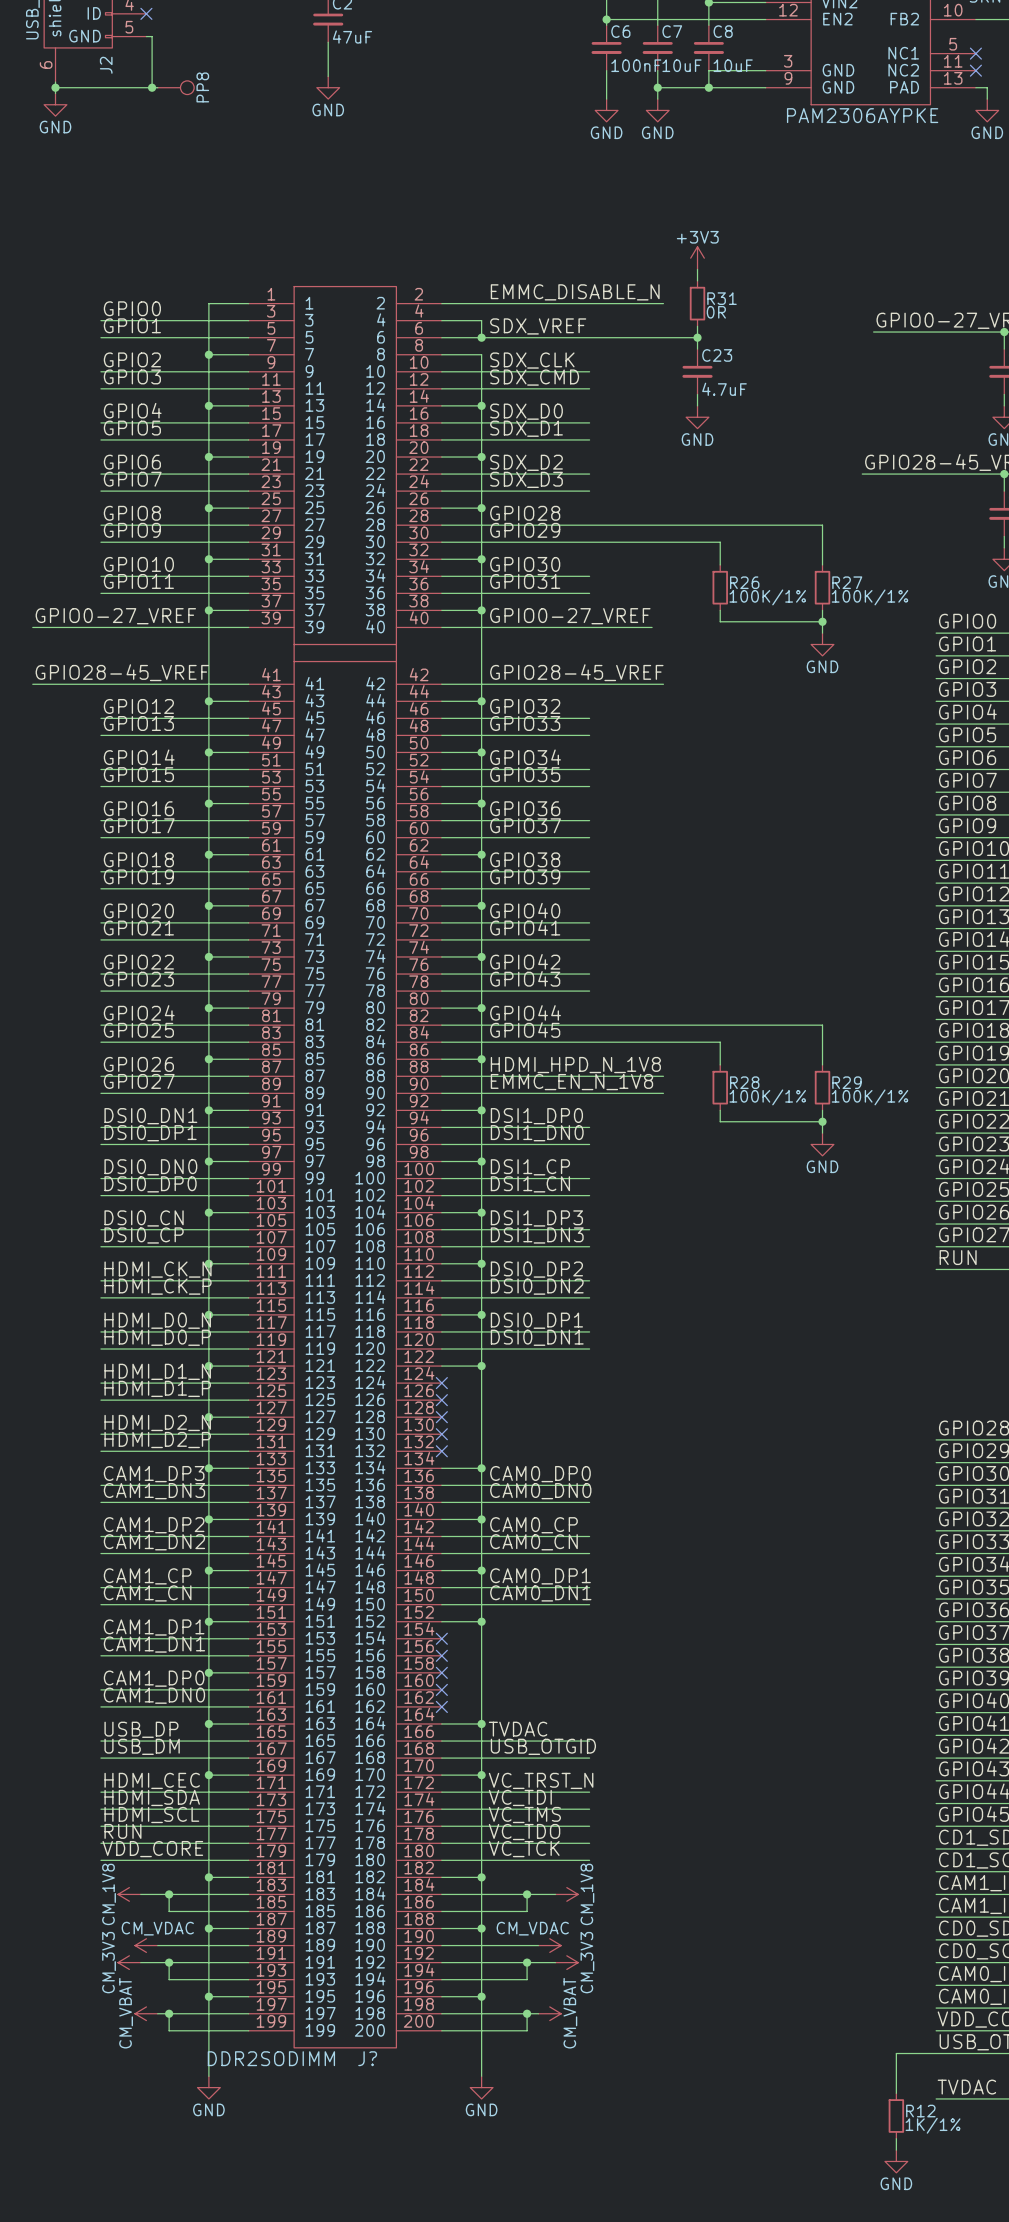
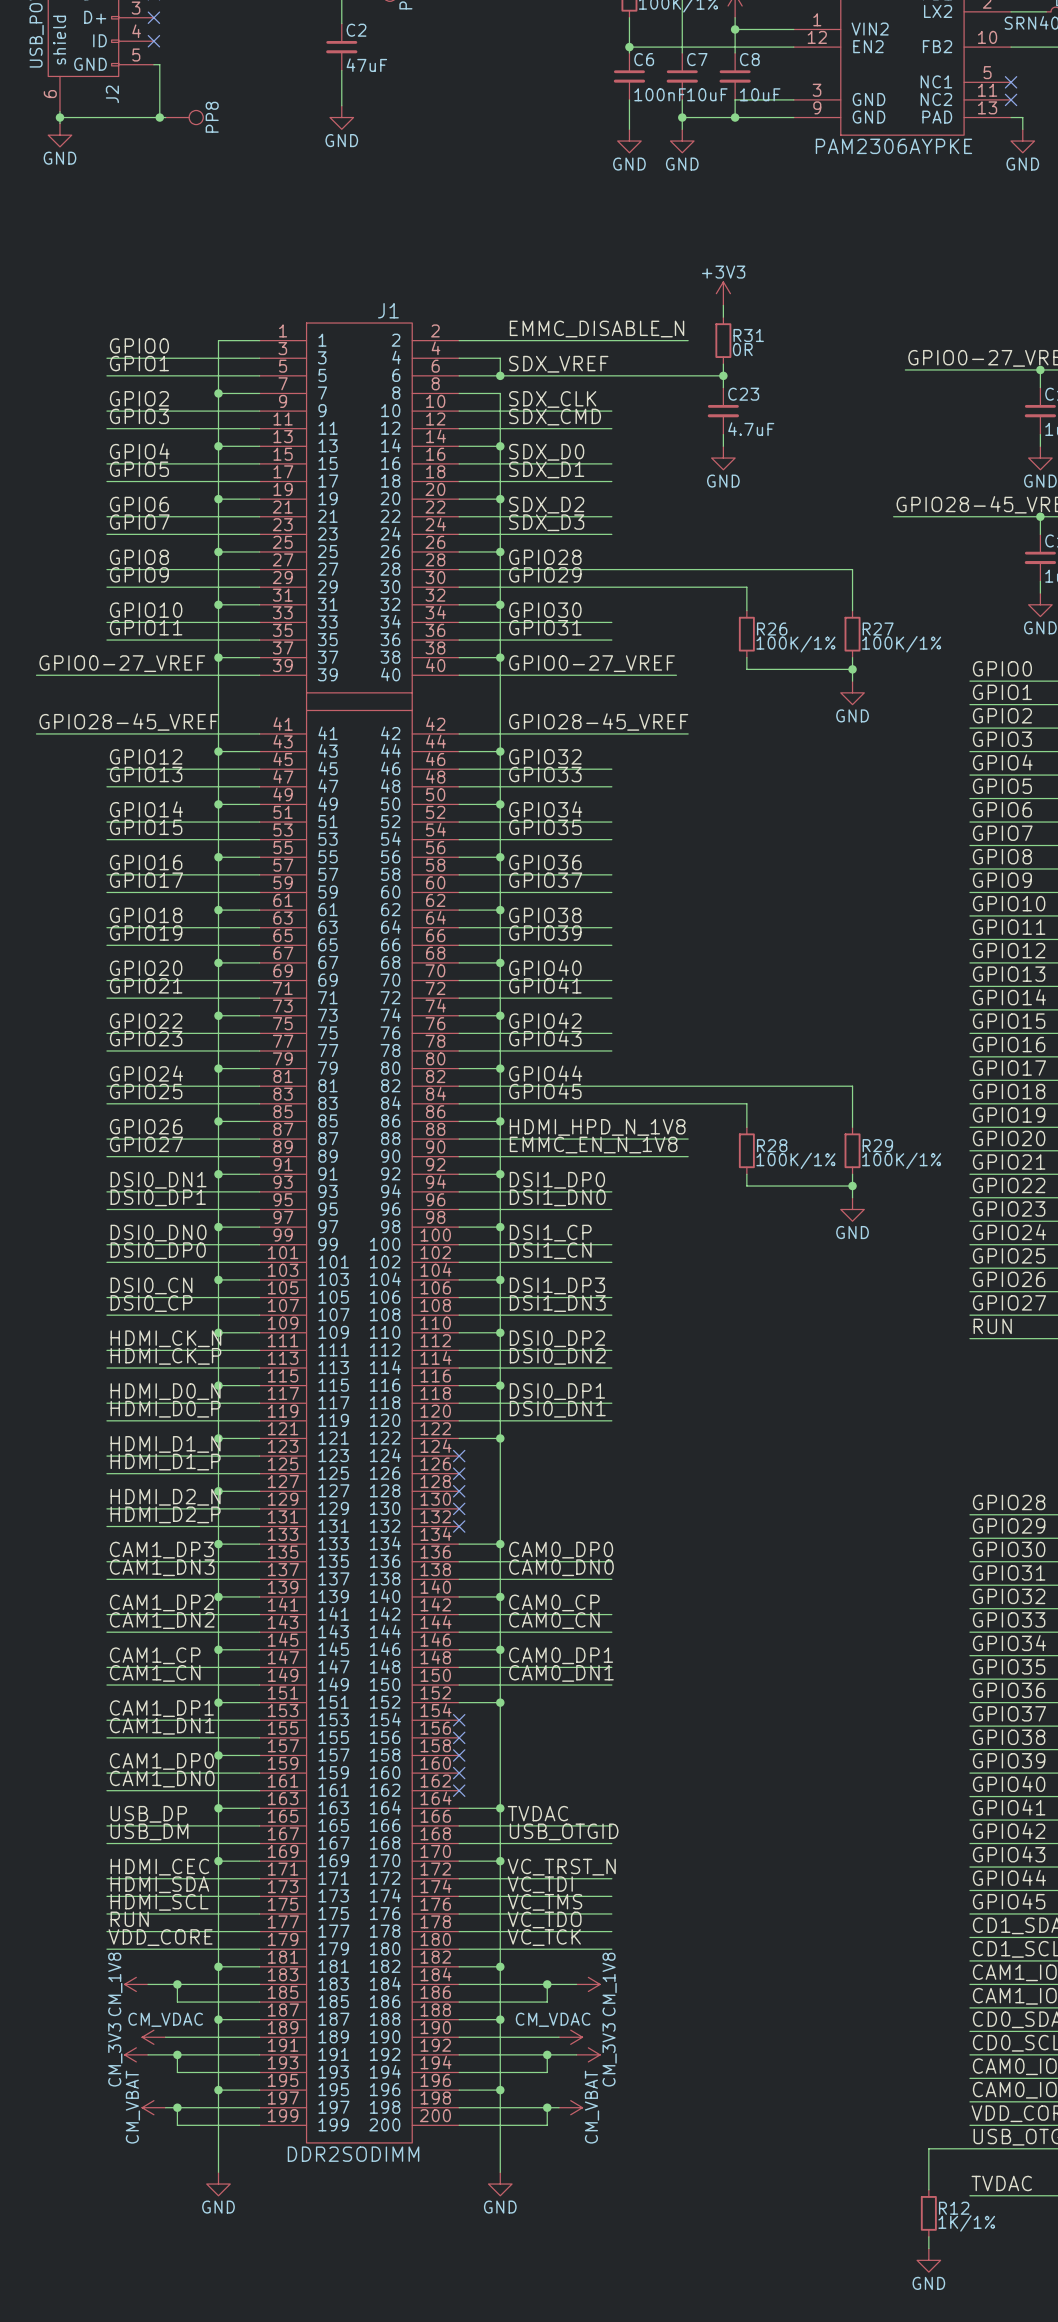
J? value position: DDR2SODIMM (271, 2058) -> DDR2SODIMM (353, 2154)
J? name: J? (367, 2058) -> J1 (388, 310)

